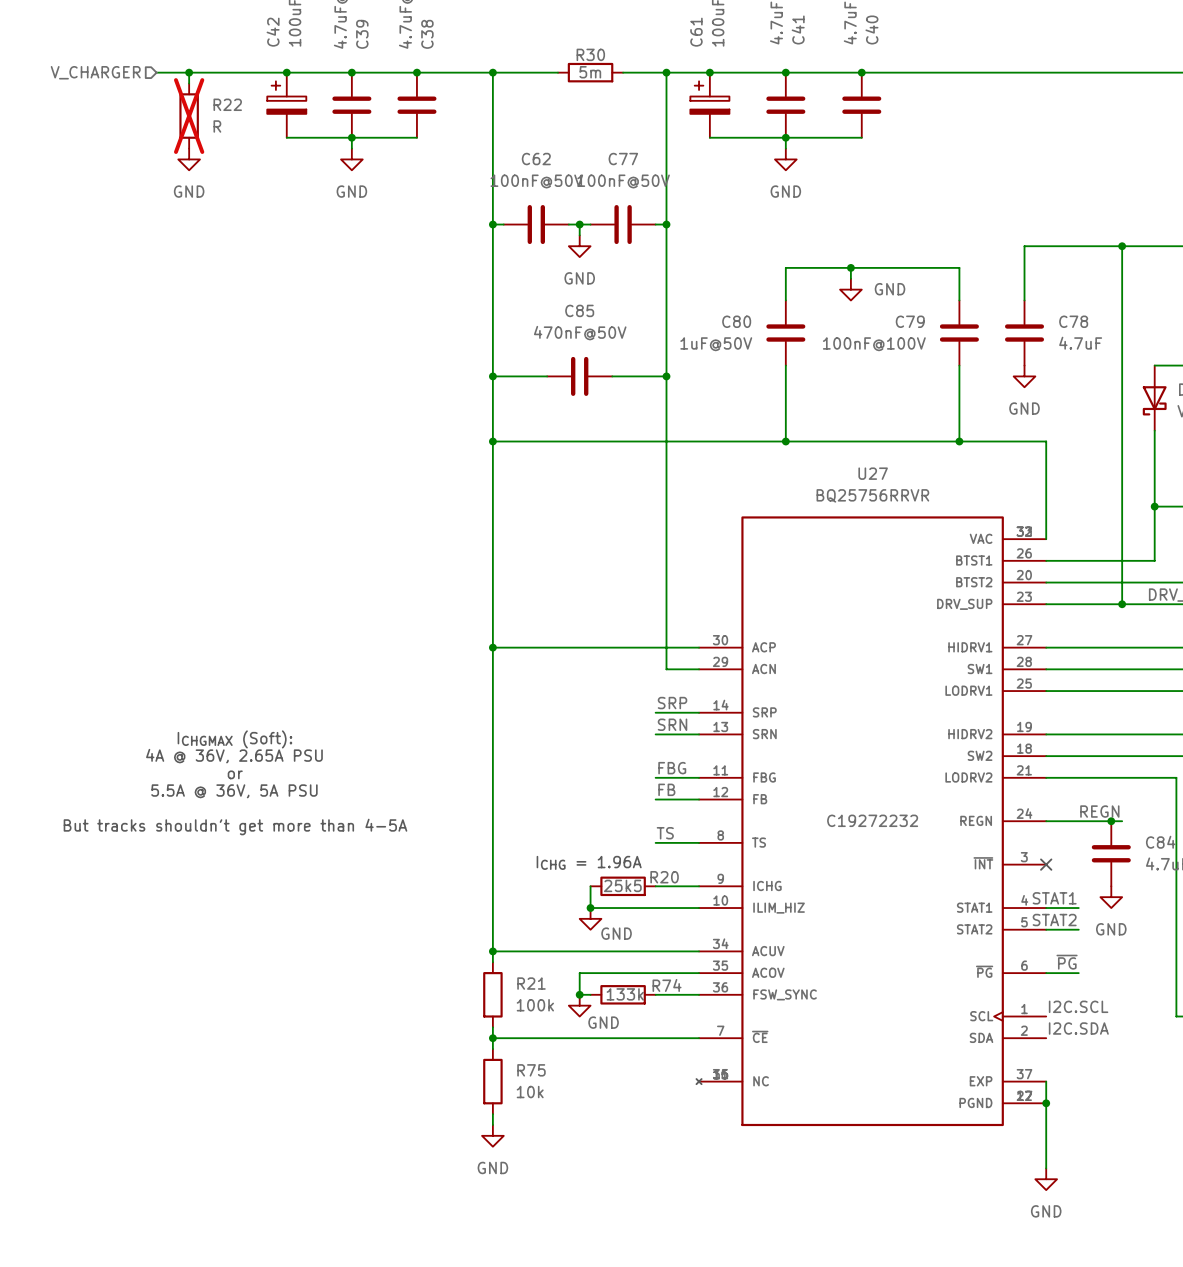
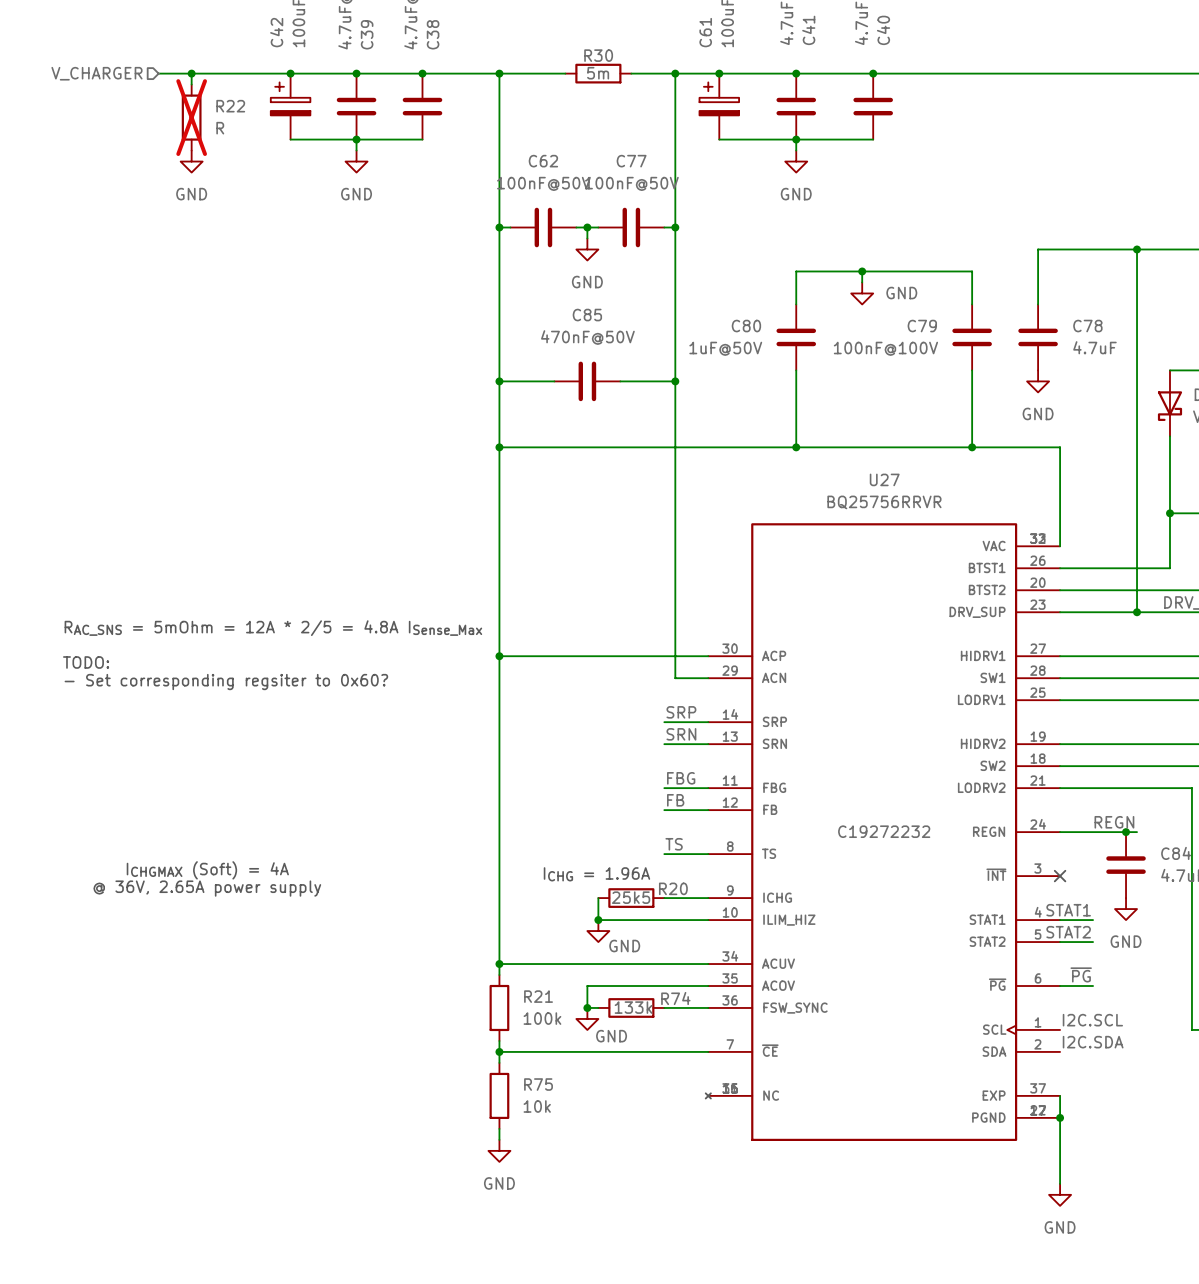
text: none -> RAC_SNS = 5mOhm = 12A * 2/5 = 4.8A ISense_Max (273, 628)
text: none -> TODO: (86, 662)
text: none -> - Set corresponding regsiter to 0x60? (226, 682)
text: ICHGMAX (Soft): (234, 739) -> none
text: 4A @ 36V, 2.65A PSU (234, 756) -> none
text: or (235, 774) -> none
text: 5.5A @ 36V, 5A PSU (234, 791) -> none
text: But tracks shouldn't get more than 4-5A (235, 827) -> none
text: none -> ICHGMAX (Soft) = 4A (207, 870)
text: none -> @ 36V, 2.65A power supply (207, 888)

